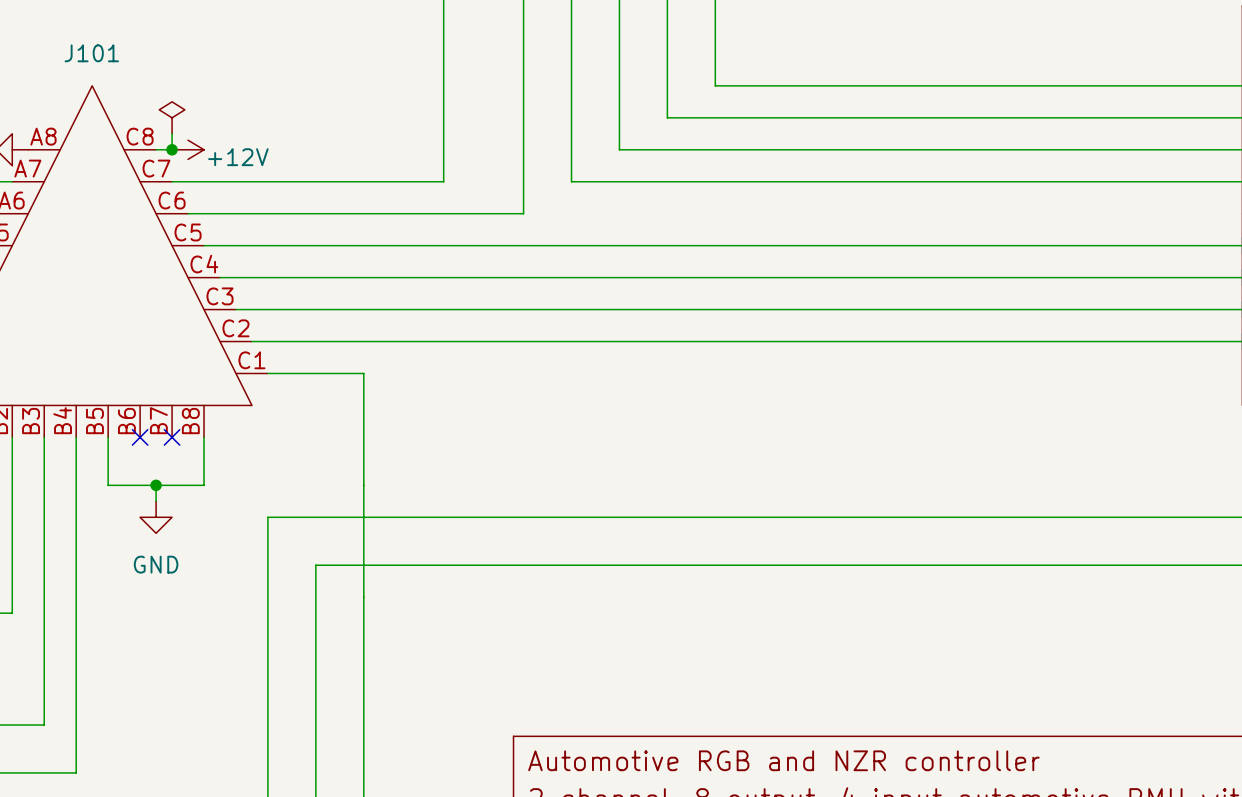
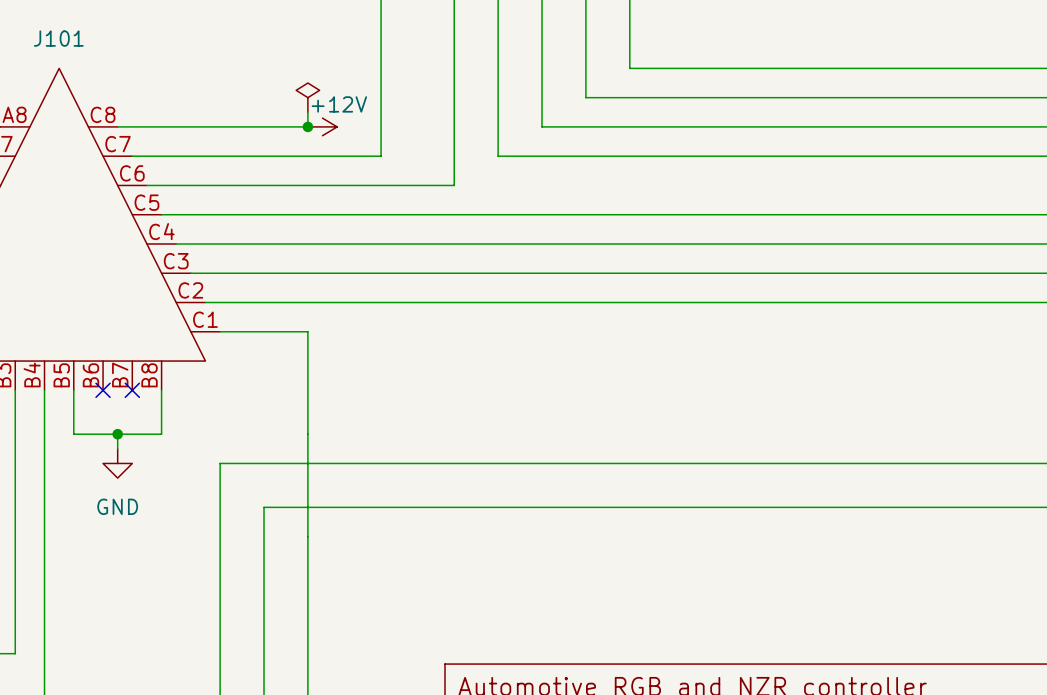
power symbol position: (172, 117) -> (307, 97)
wire: (172, 133) (172, 149) -> (307, 112) (307, 126) (132, 126)
junction: (172, 149) -> none
power symbol position: +12V (188, 149) -> +12V (322, 126)
junction: none -> (307, 126)
power symbol text position: +12V (238, 157) -> +12V (339, 104)

